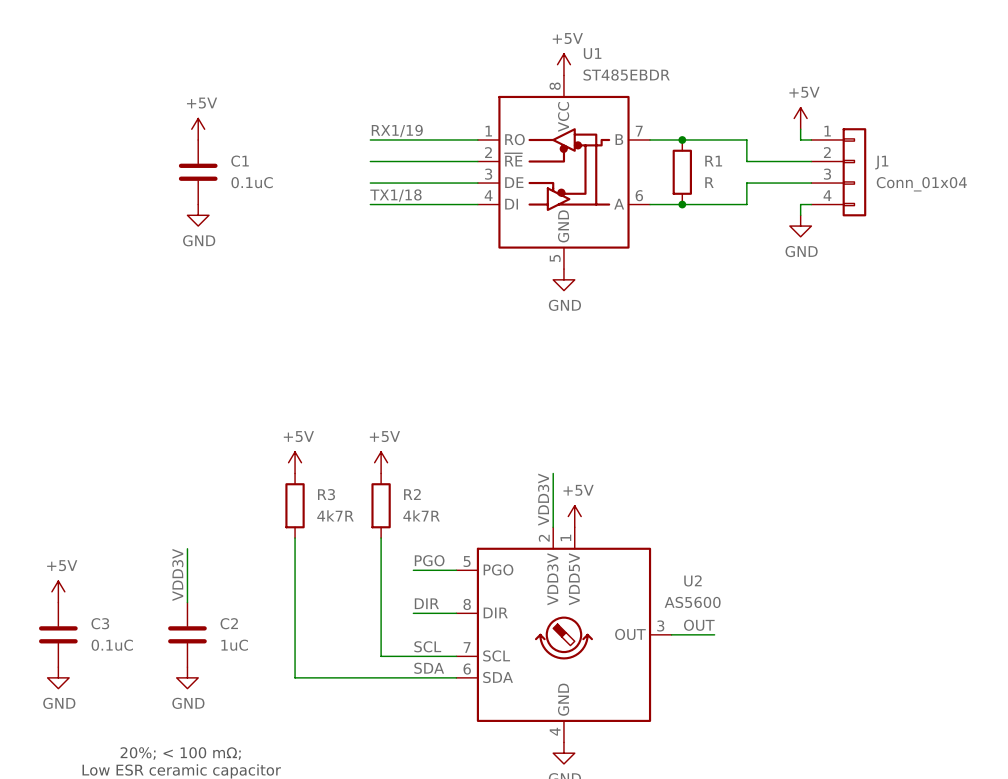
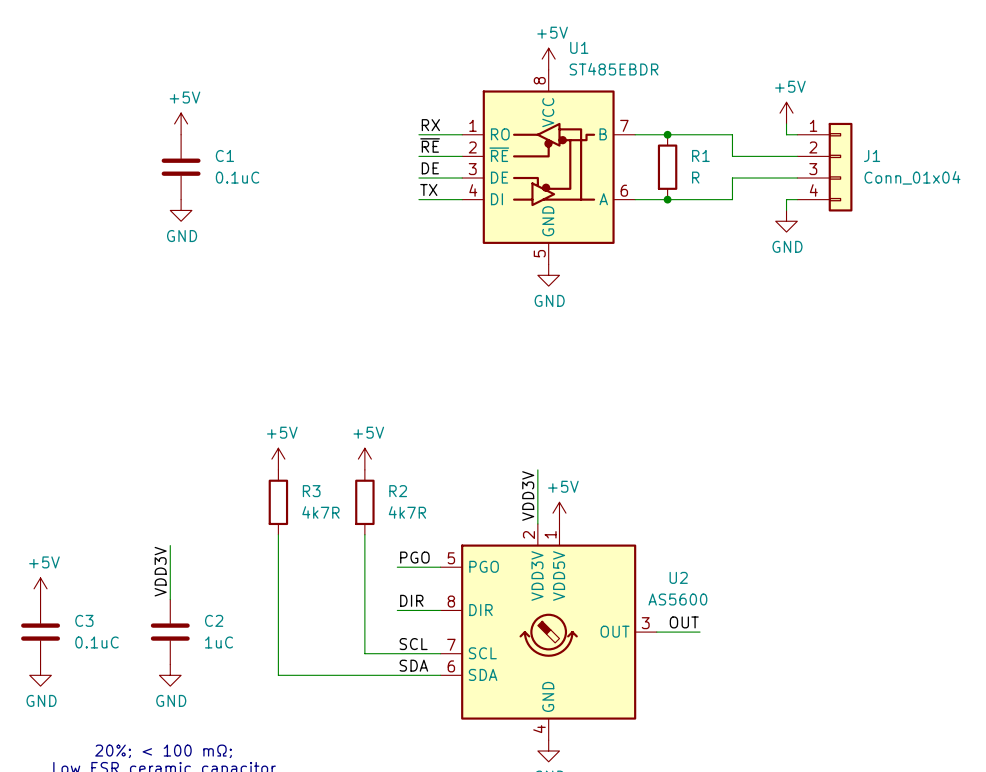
label: RX1/19 (397, 130) -> none
label: none -> RX (430, 125)
wire: (370, 139) (434, 139) -> none
label: none -> ~{RE} (430, 145)
wire: (370, 161) (434, 161) -> none
label: none -> DE (430, 168)
wire: (370, 183) (434, 183) -> none
label: none -> TX (428, 189)
label: TX1/18 (395, 195) -> none
wire: (370, 204) (434, 204) -> none

